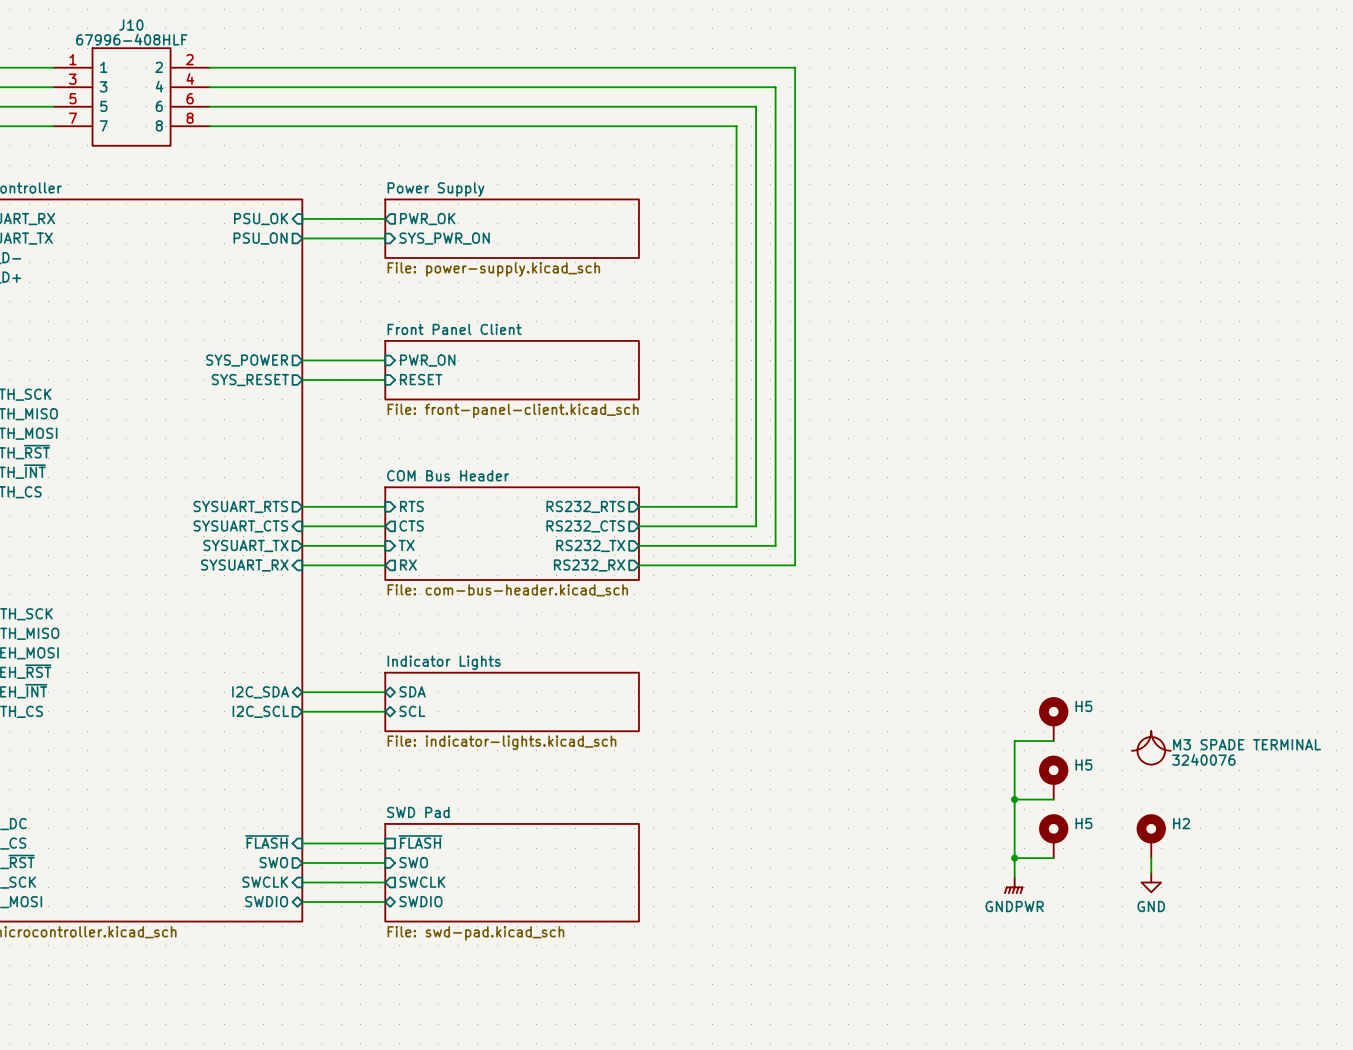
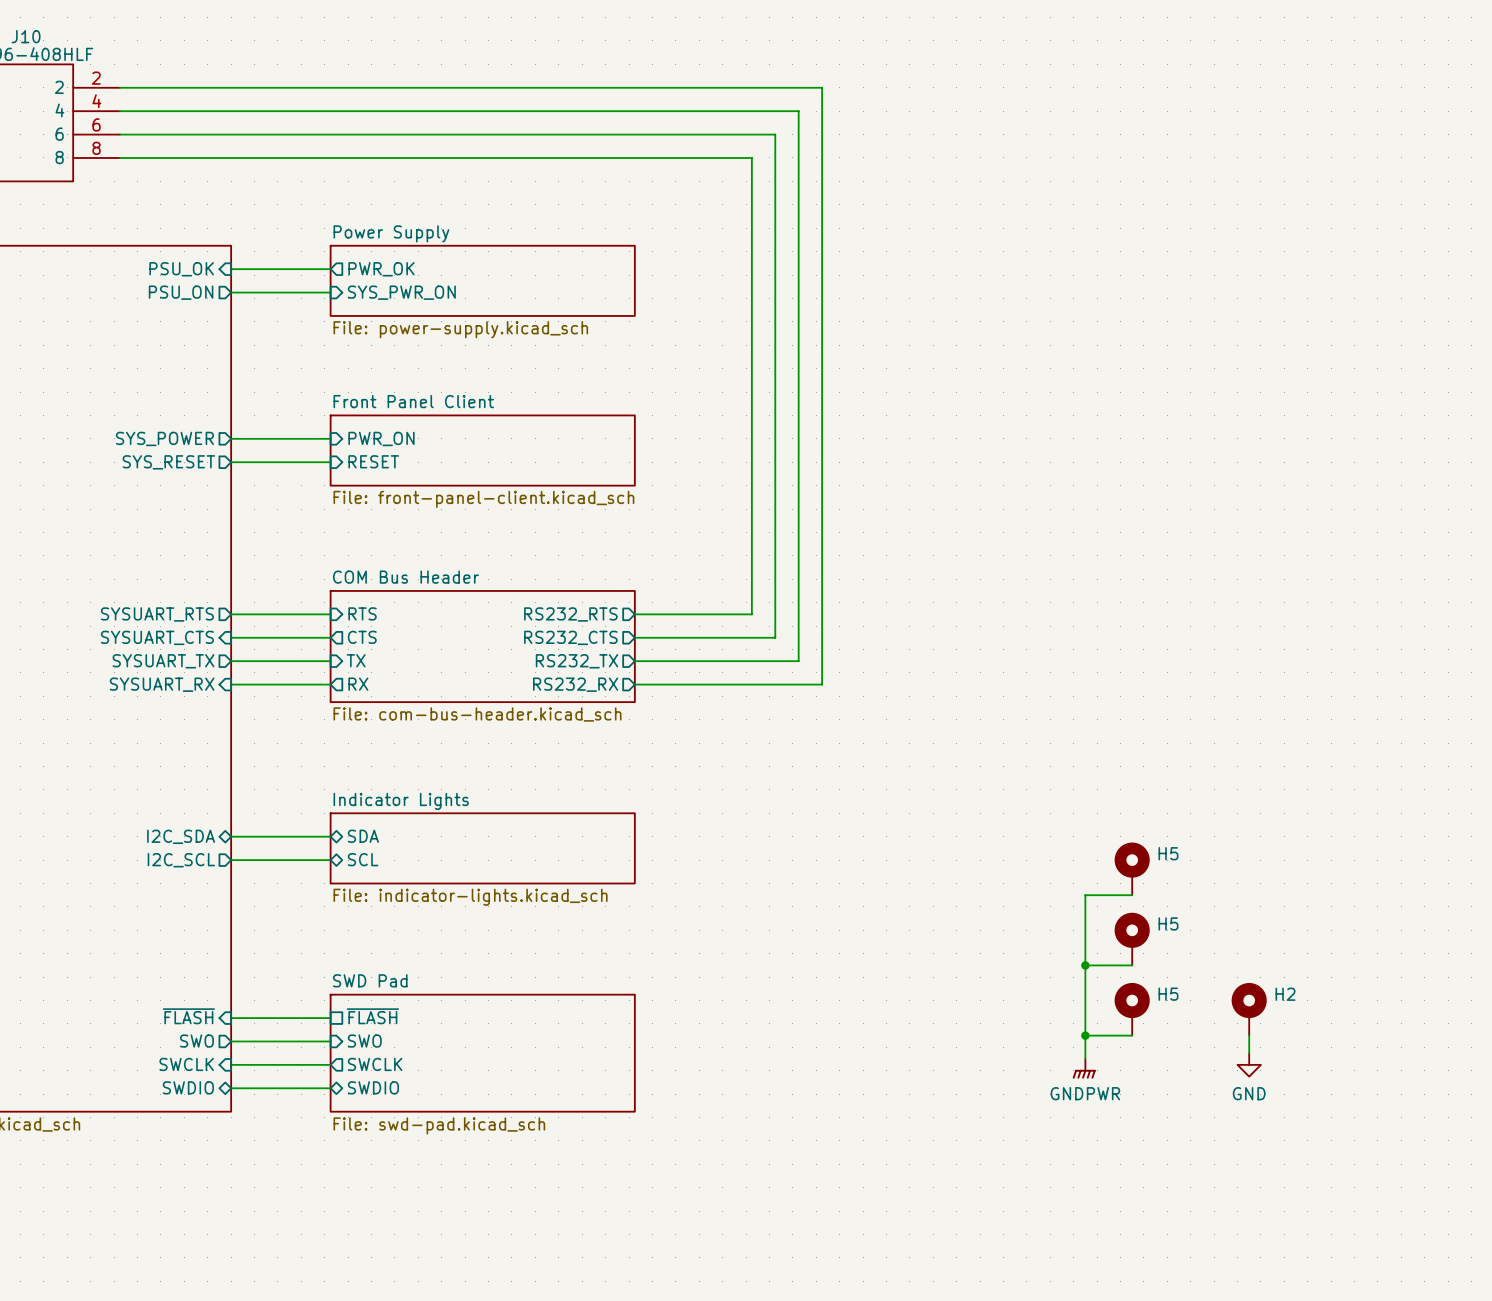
part: 3240076 (1151, 747) -> none

